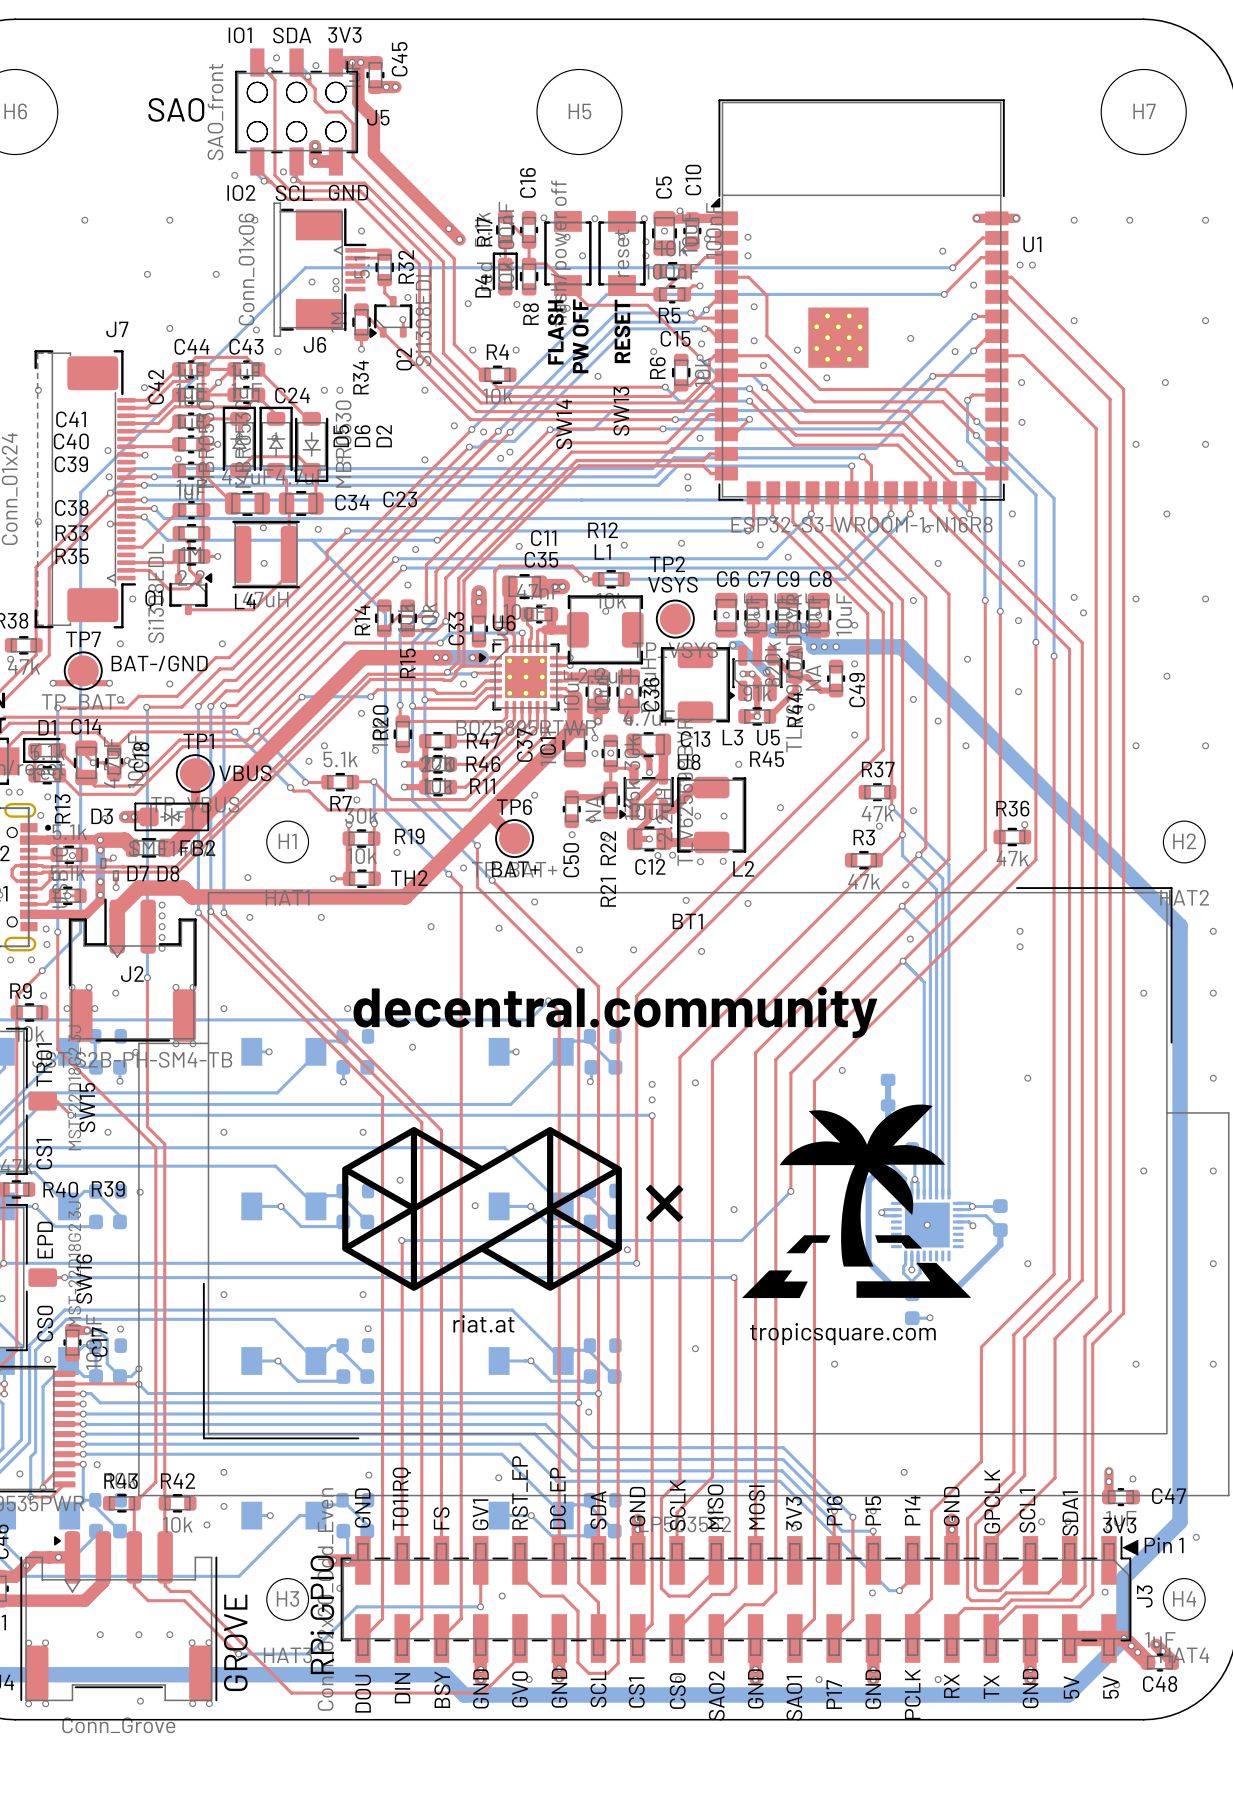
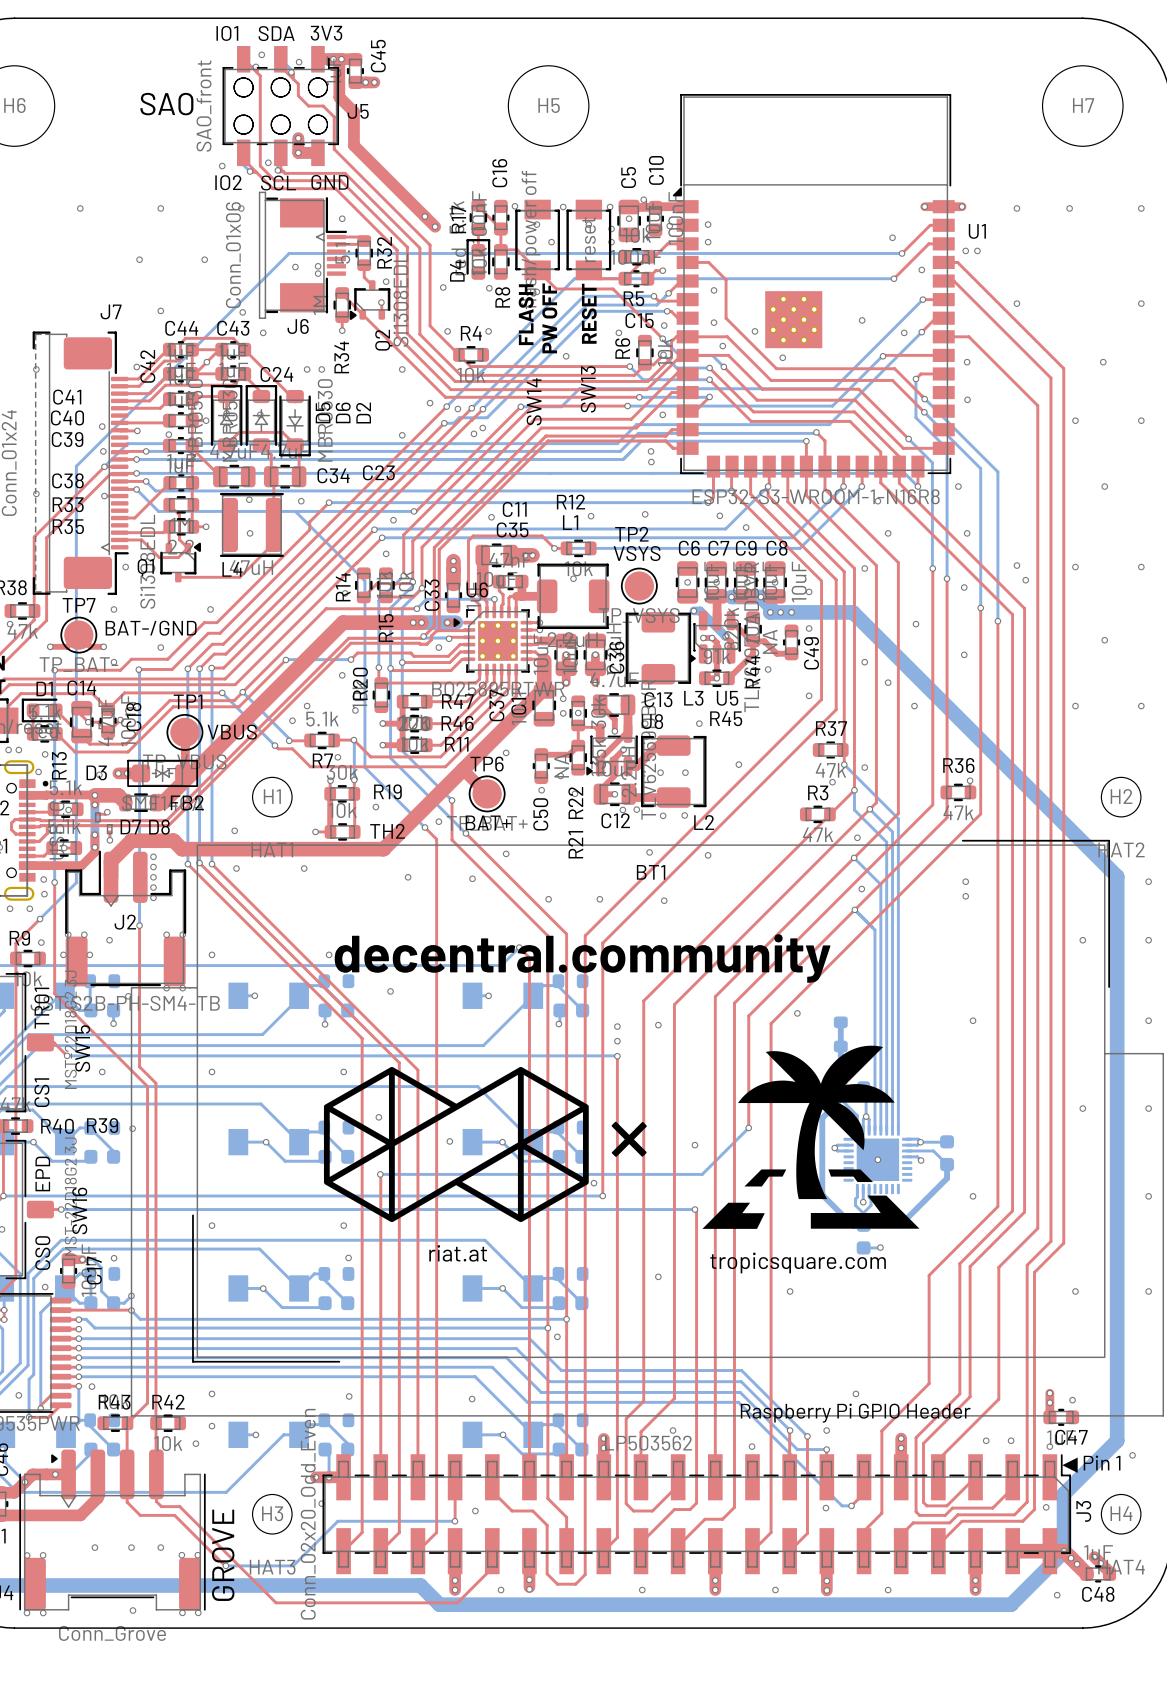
text: RST_EP (520, 1492) -> none
text: none -> Raspberry Pi GPIO Header (855, 1413)
C47 name position: C47 (1169, 1496) -> C47 (1071, 1437)
text: T01IRQ (401, 1498) -> none
text: DC_EP (557, 1498) -> none
text: GPCLK (992, 1501) -> none
text: SCLK (677, 1505) -> none
text: GND (637, 1506) -> none
text: MISO (715, 1506) -> none
text: GND (951, 1506) -> none
text: MOSI (756, 1507) -> none
text: GND (362, 1508) -> none
text: SDA (598, 1510) -> none
text: P16 (834, 1510) -> none
text: P15 (873, 1510) -> none
text: P14 (912, 1510) -> none
text: SCL1 (1027, 1510) -> none
text: 3V3 (794, 1513) -> none
text: SDA1 (1070, 1513) -> none
text: GV1 (480, 1514) -> none
text: FS (441, 1518) -> none
text: 3V3 (1119, 1525) -> none
text: RPi GPIO (322, 1614) -> none
text: RX (951, 1686) -> none
text: TX (991, 1687) -> none
text: 5V (1071, 1687) -> none
text: 5V (1111, 1687) -> none
text: DIN (402, 1688) -> none
text: GND (480, 1688) -> none
text: GND (559, 1688) -> none
text: SCL (598, 1688) -> none
text: GND (755, 1688) -> none
text: GND (1030, 1688) -> none
text: BSY (442, 1689) -> none
text: GV0 (520, 1689) -> none
text: GND (873, 1689) -> none
text: CS0 (677, 1691) -> none
text: CS1 (636, 1692) -> none
text: DOU (363, 1693) -> none
text: P17 (834, 1694) -> none
text: PCLK (912, 1694) -> none
text: SAO2 (716, 1695) -> none
text: SAO1 (794, 1698) -> none

